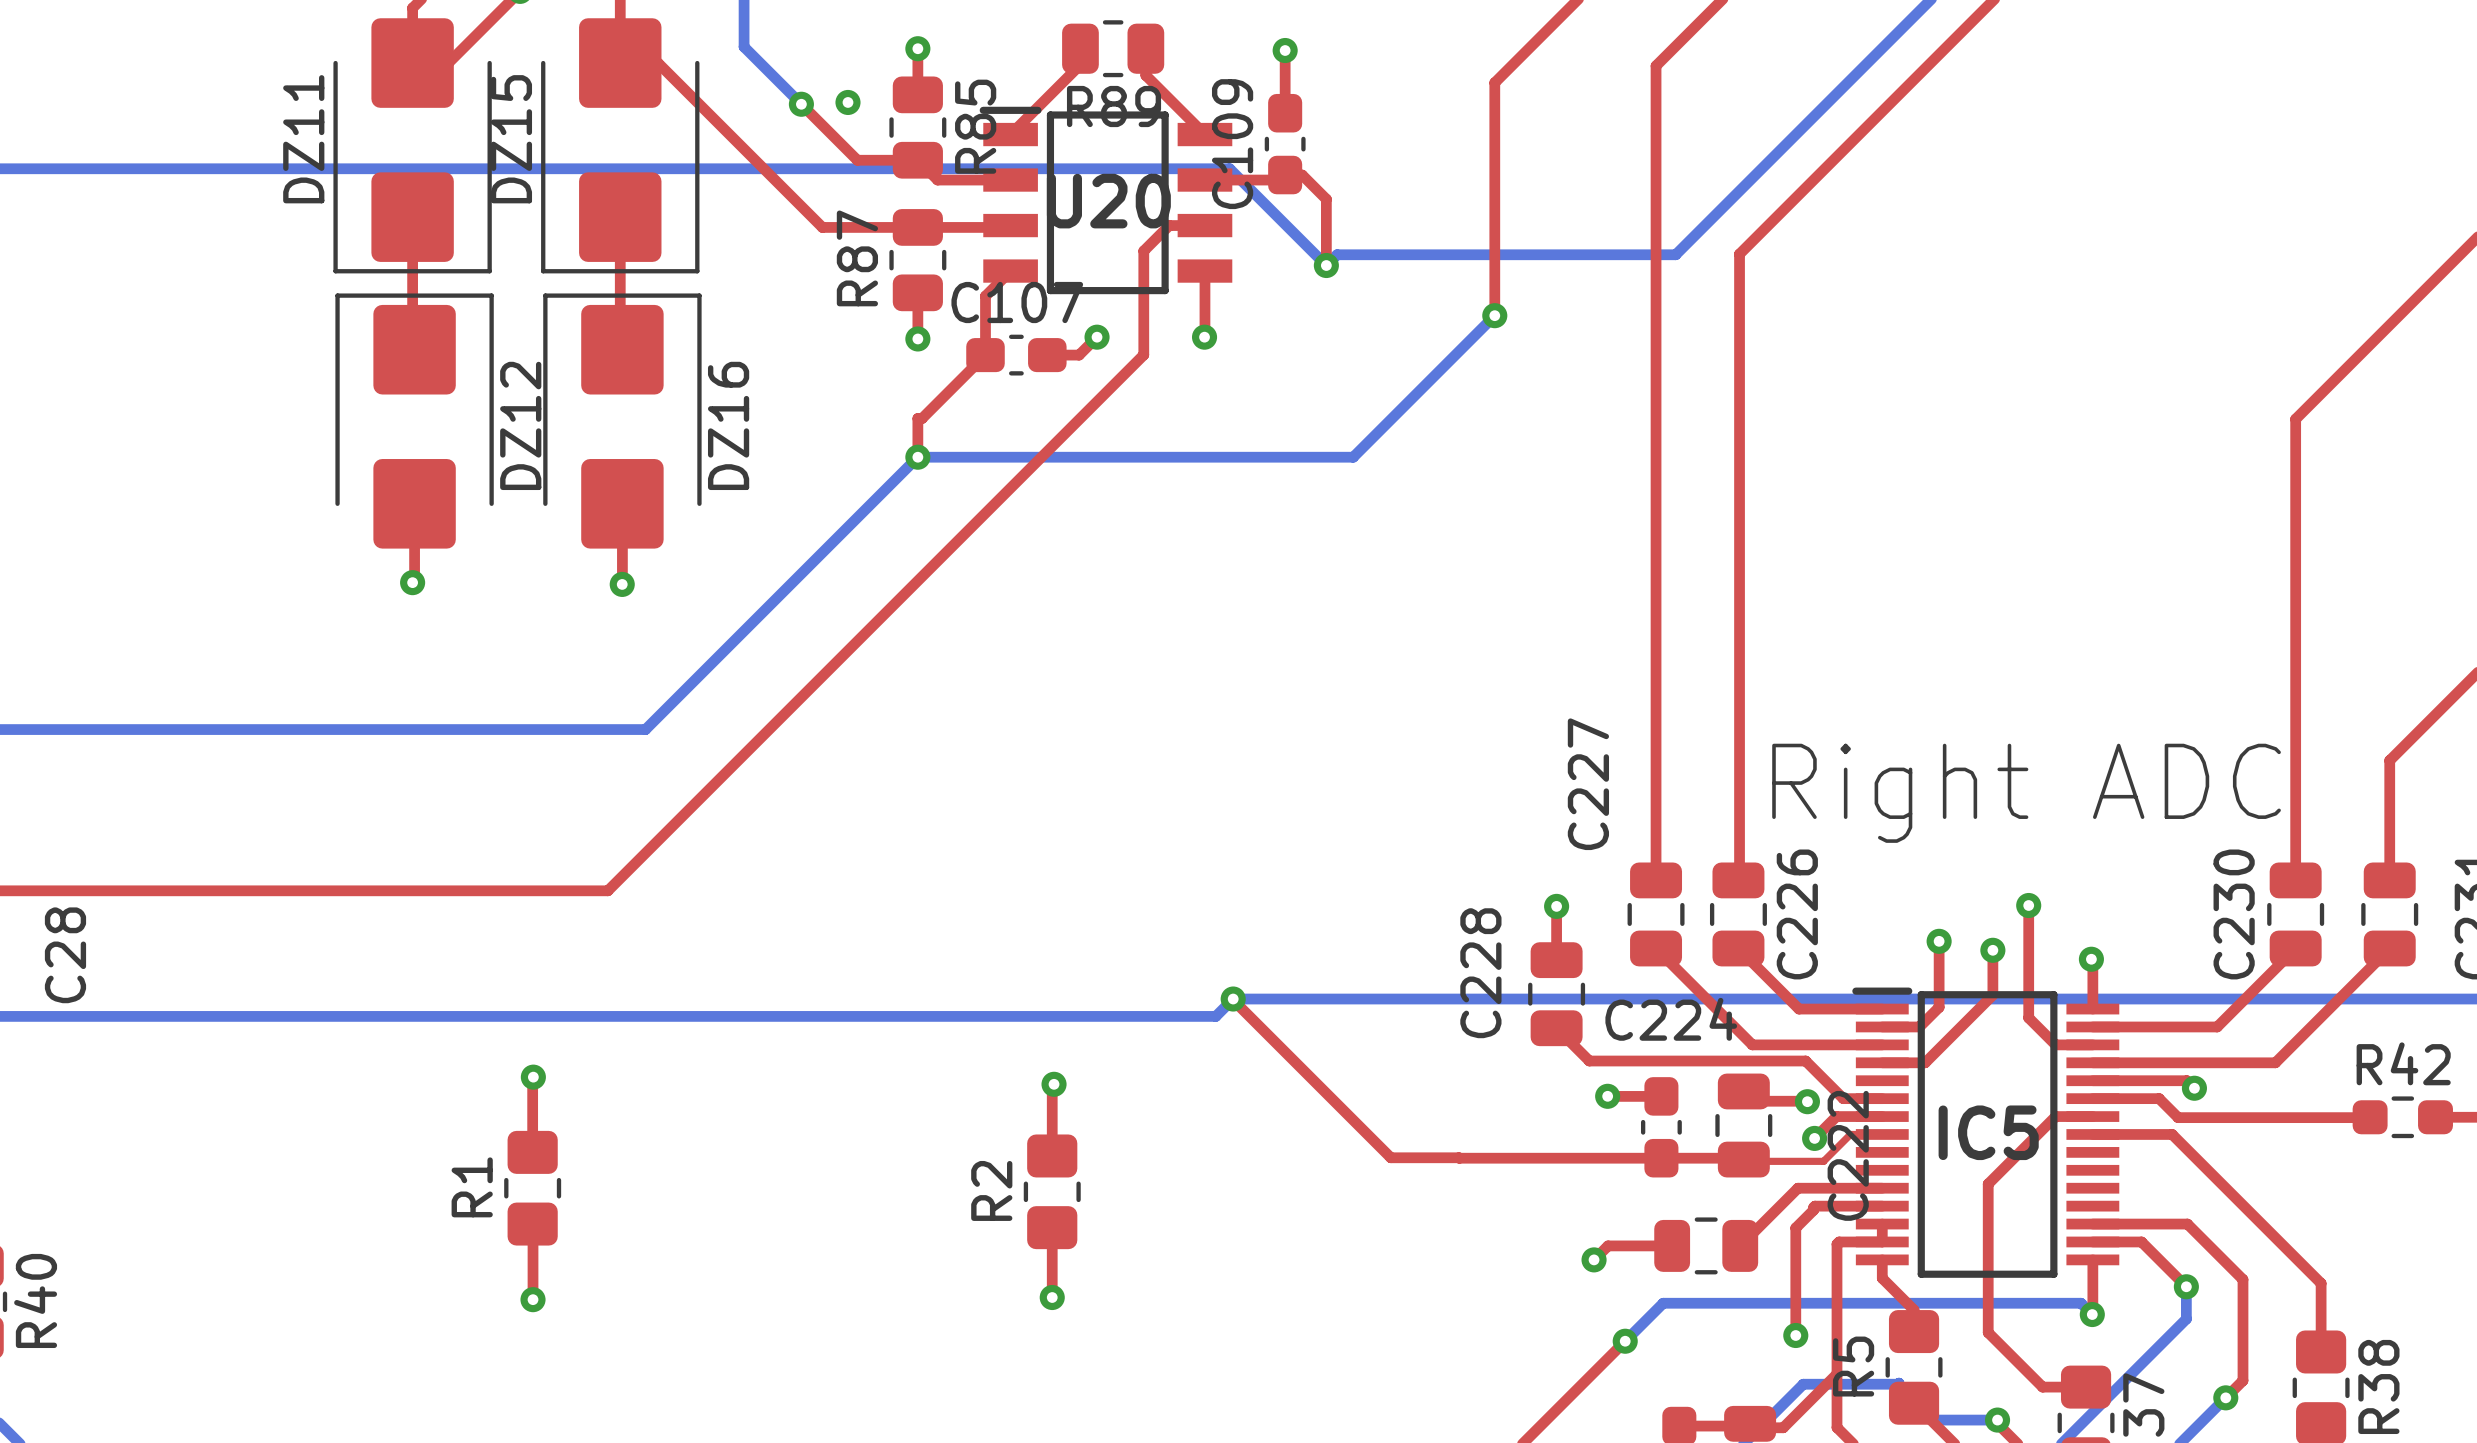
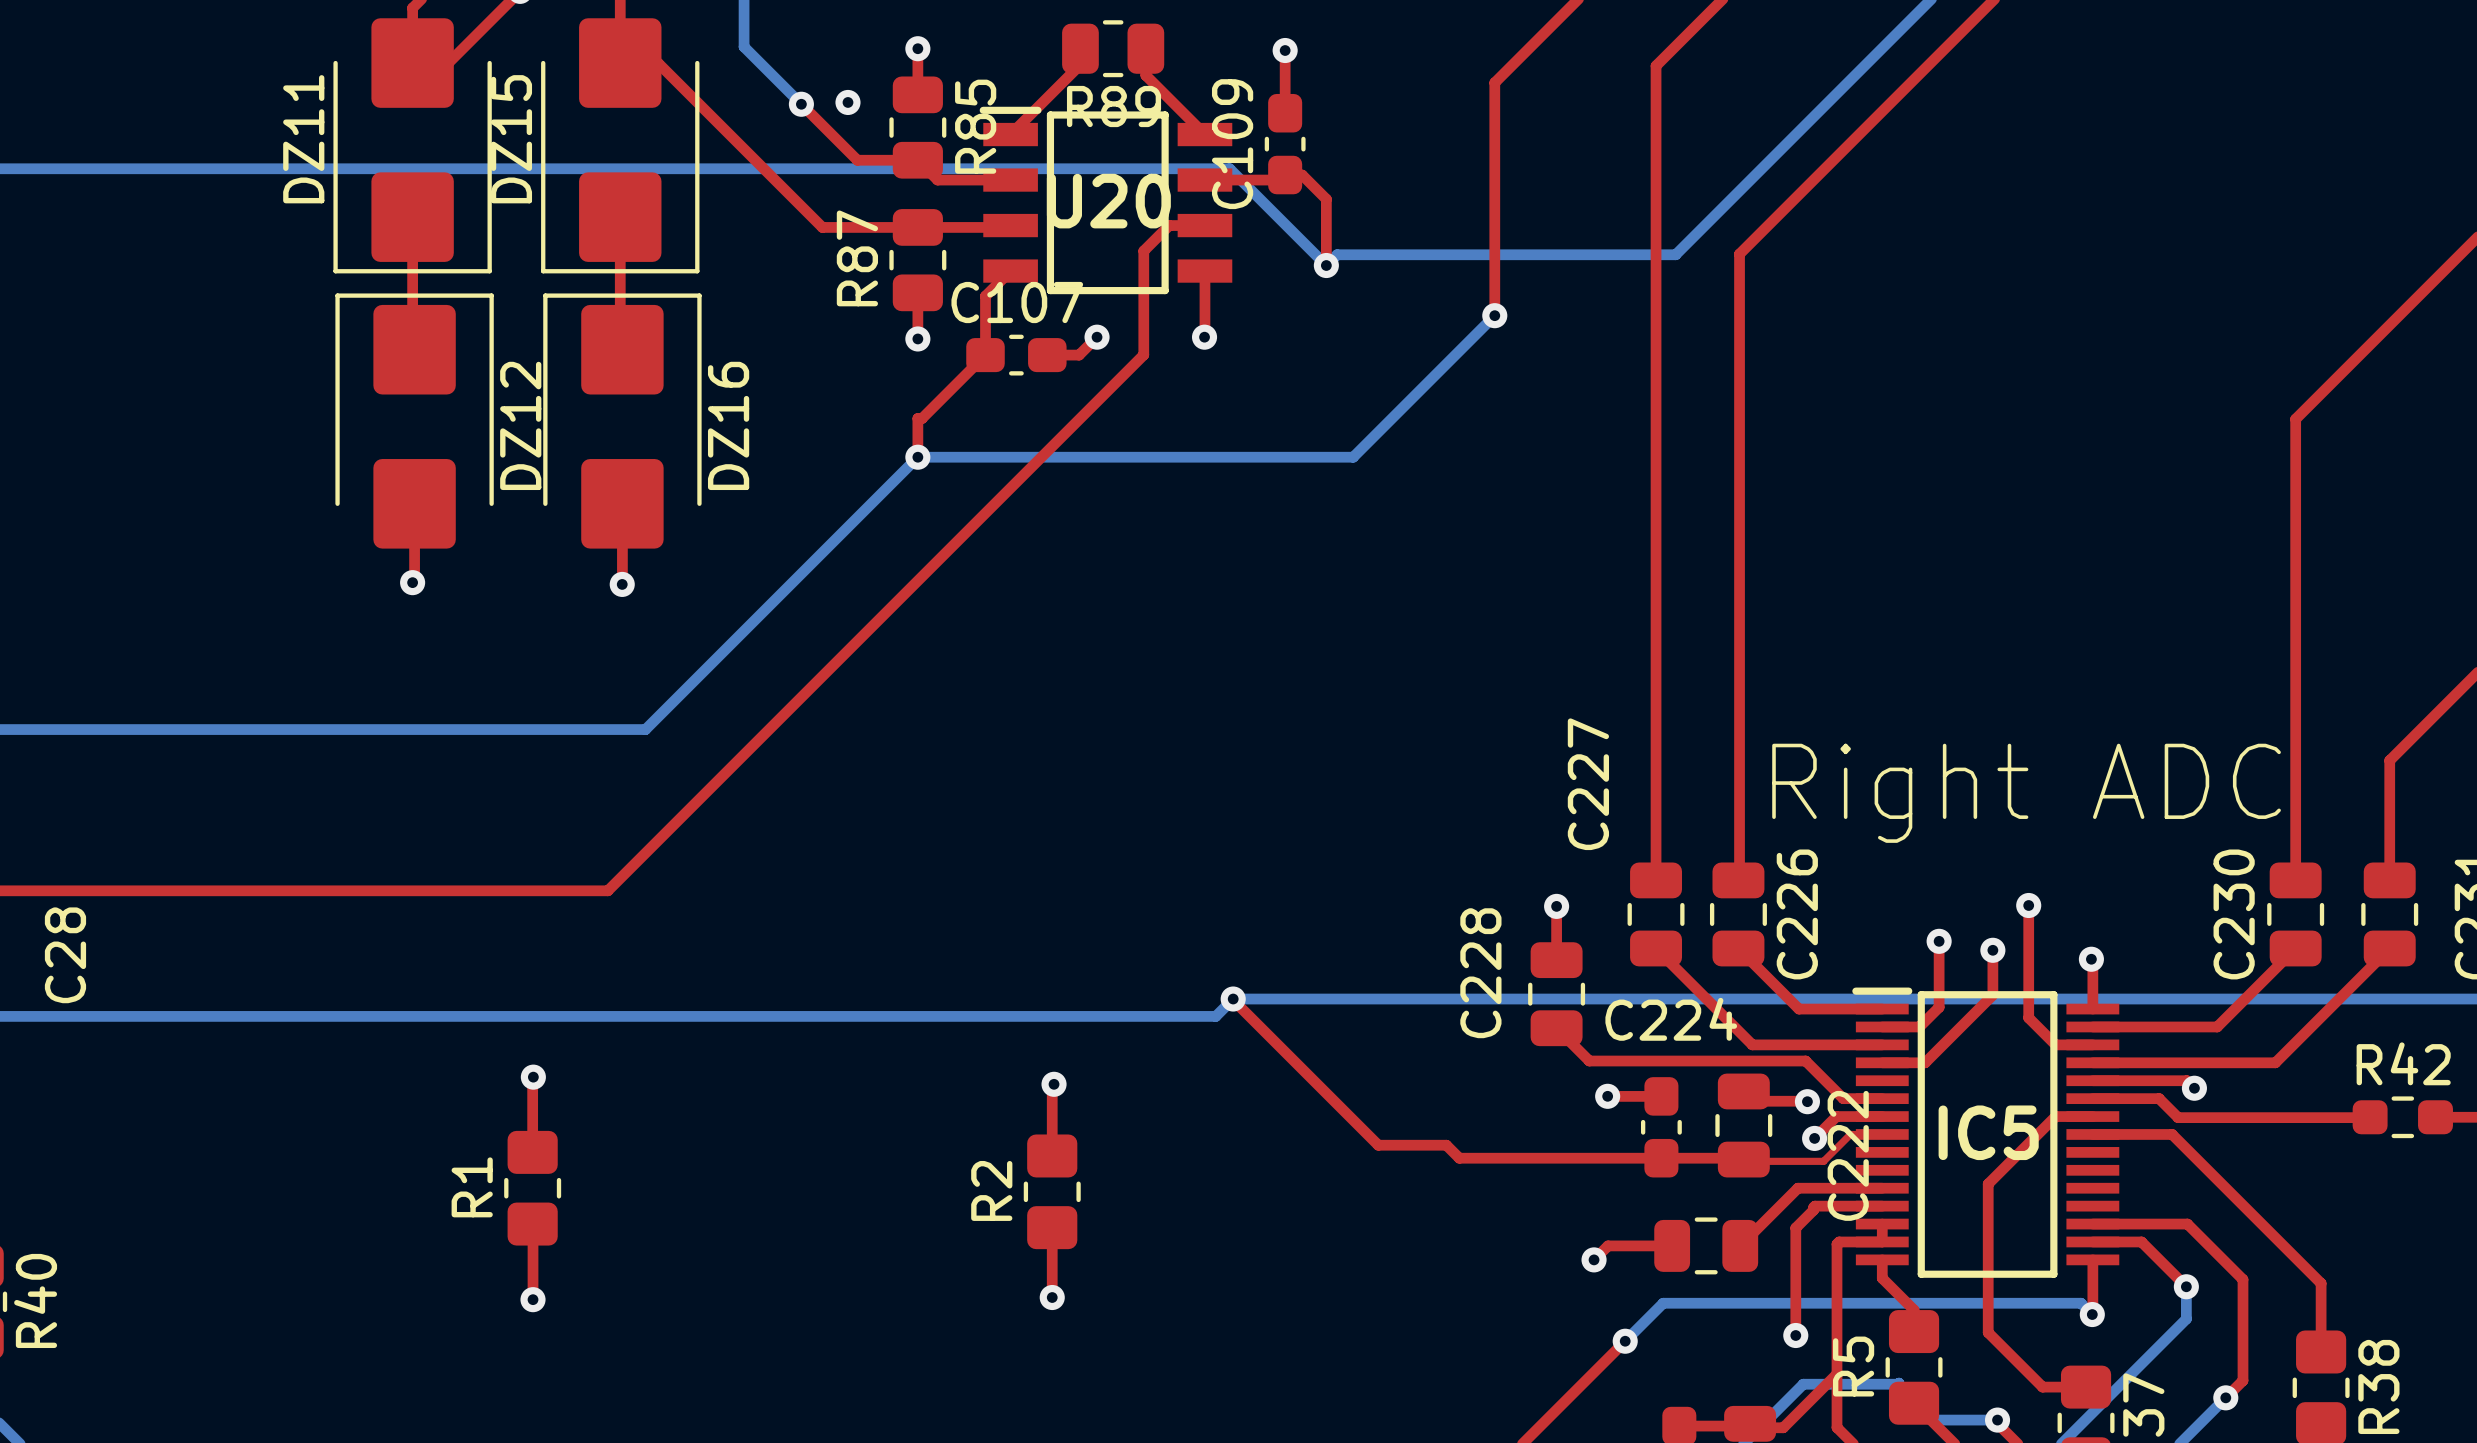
top track: (1378, 1145) (1390, 1157) (1458, 1157) -> (1378, 1145) (1446, 1145) (1458, 1157)

